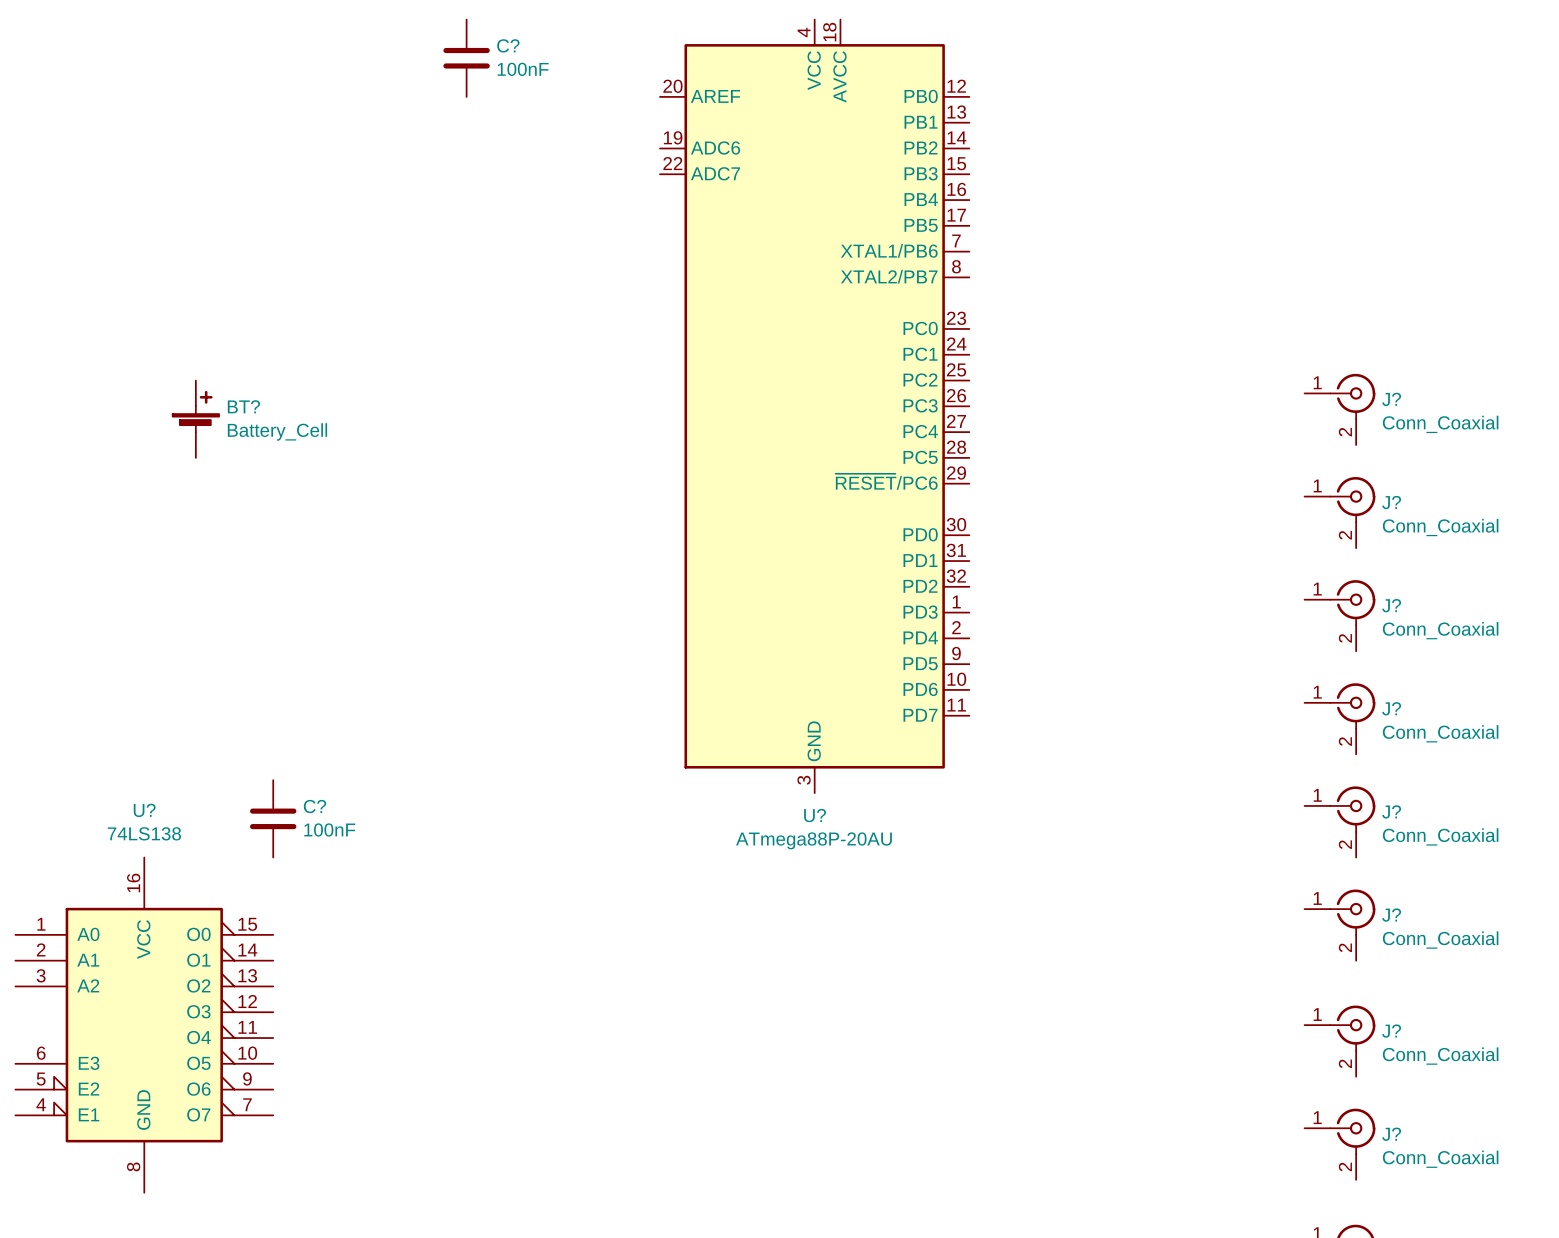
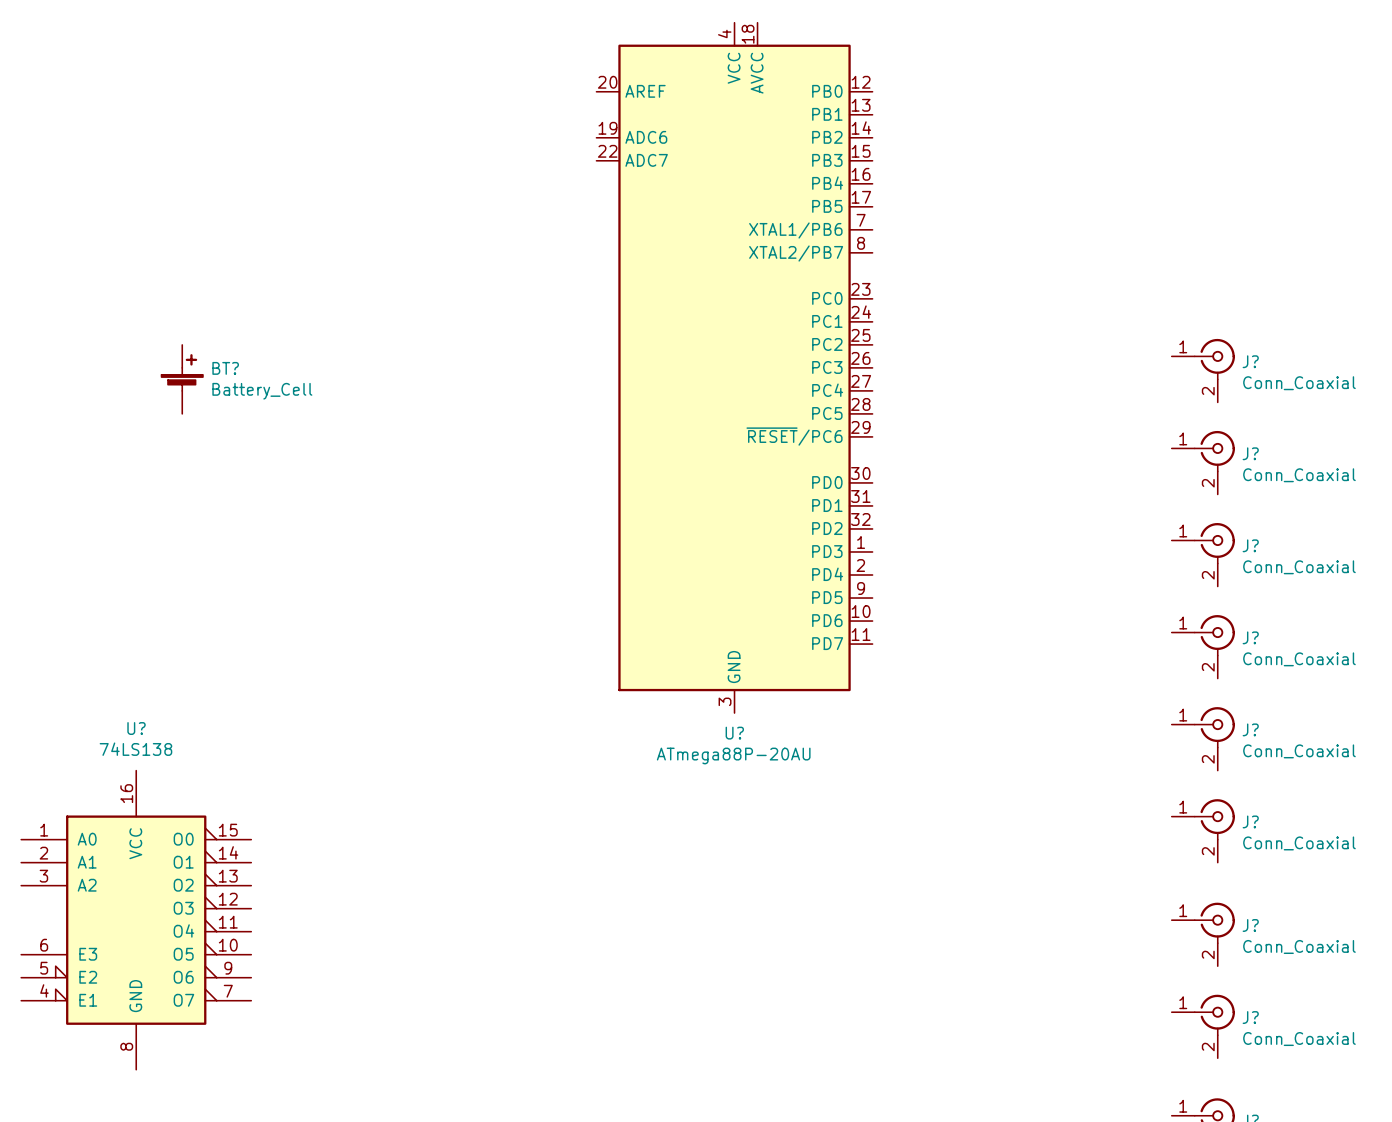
C?: 100nF (466, 58) -> none
C?: 100nF (273, 818) -> none

